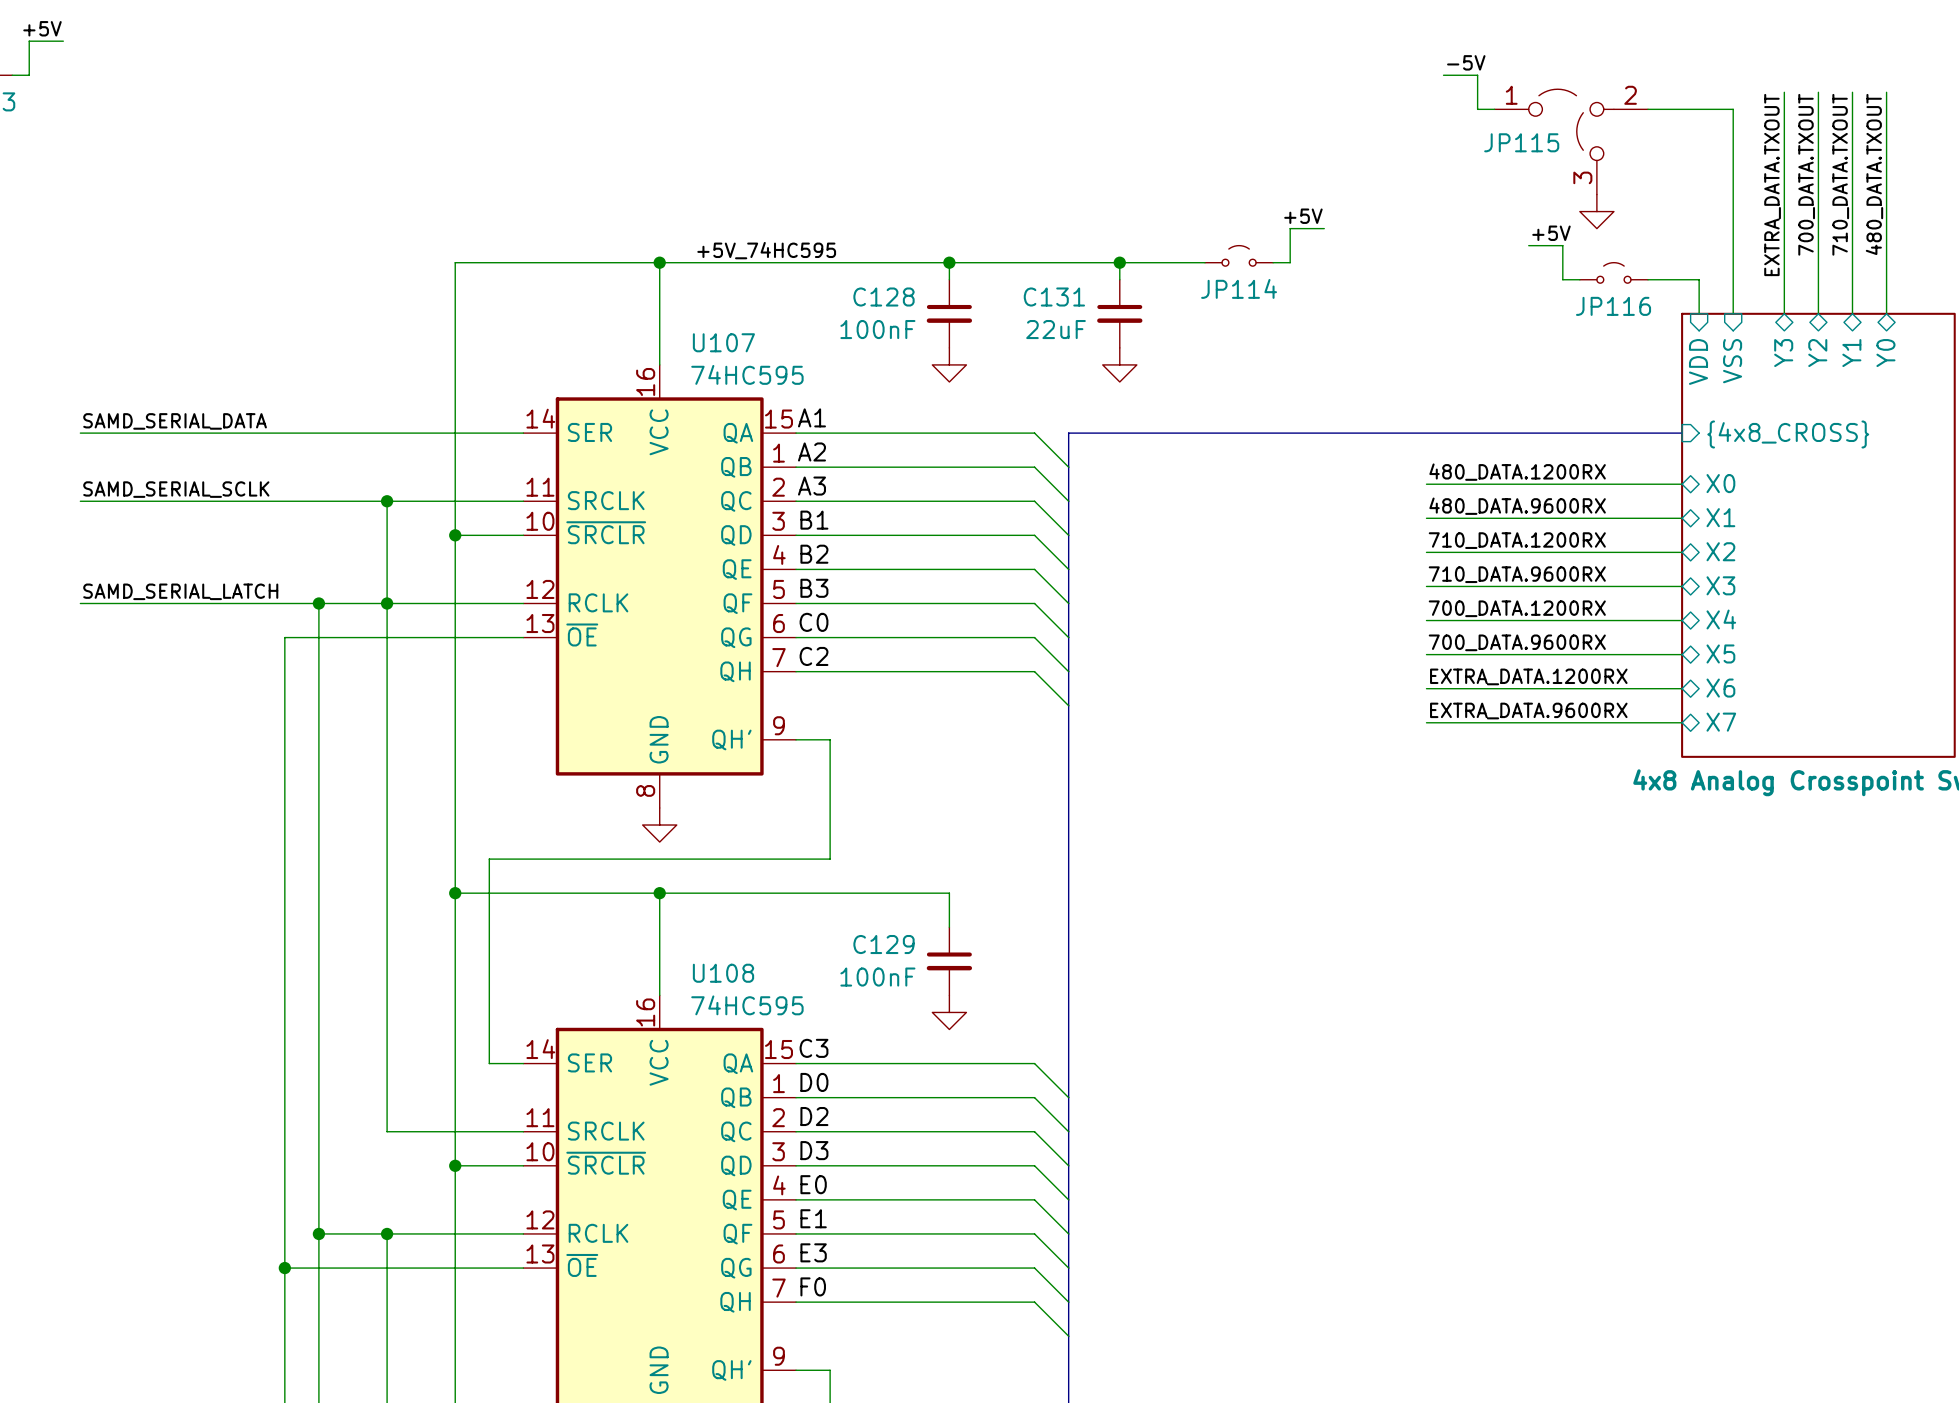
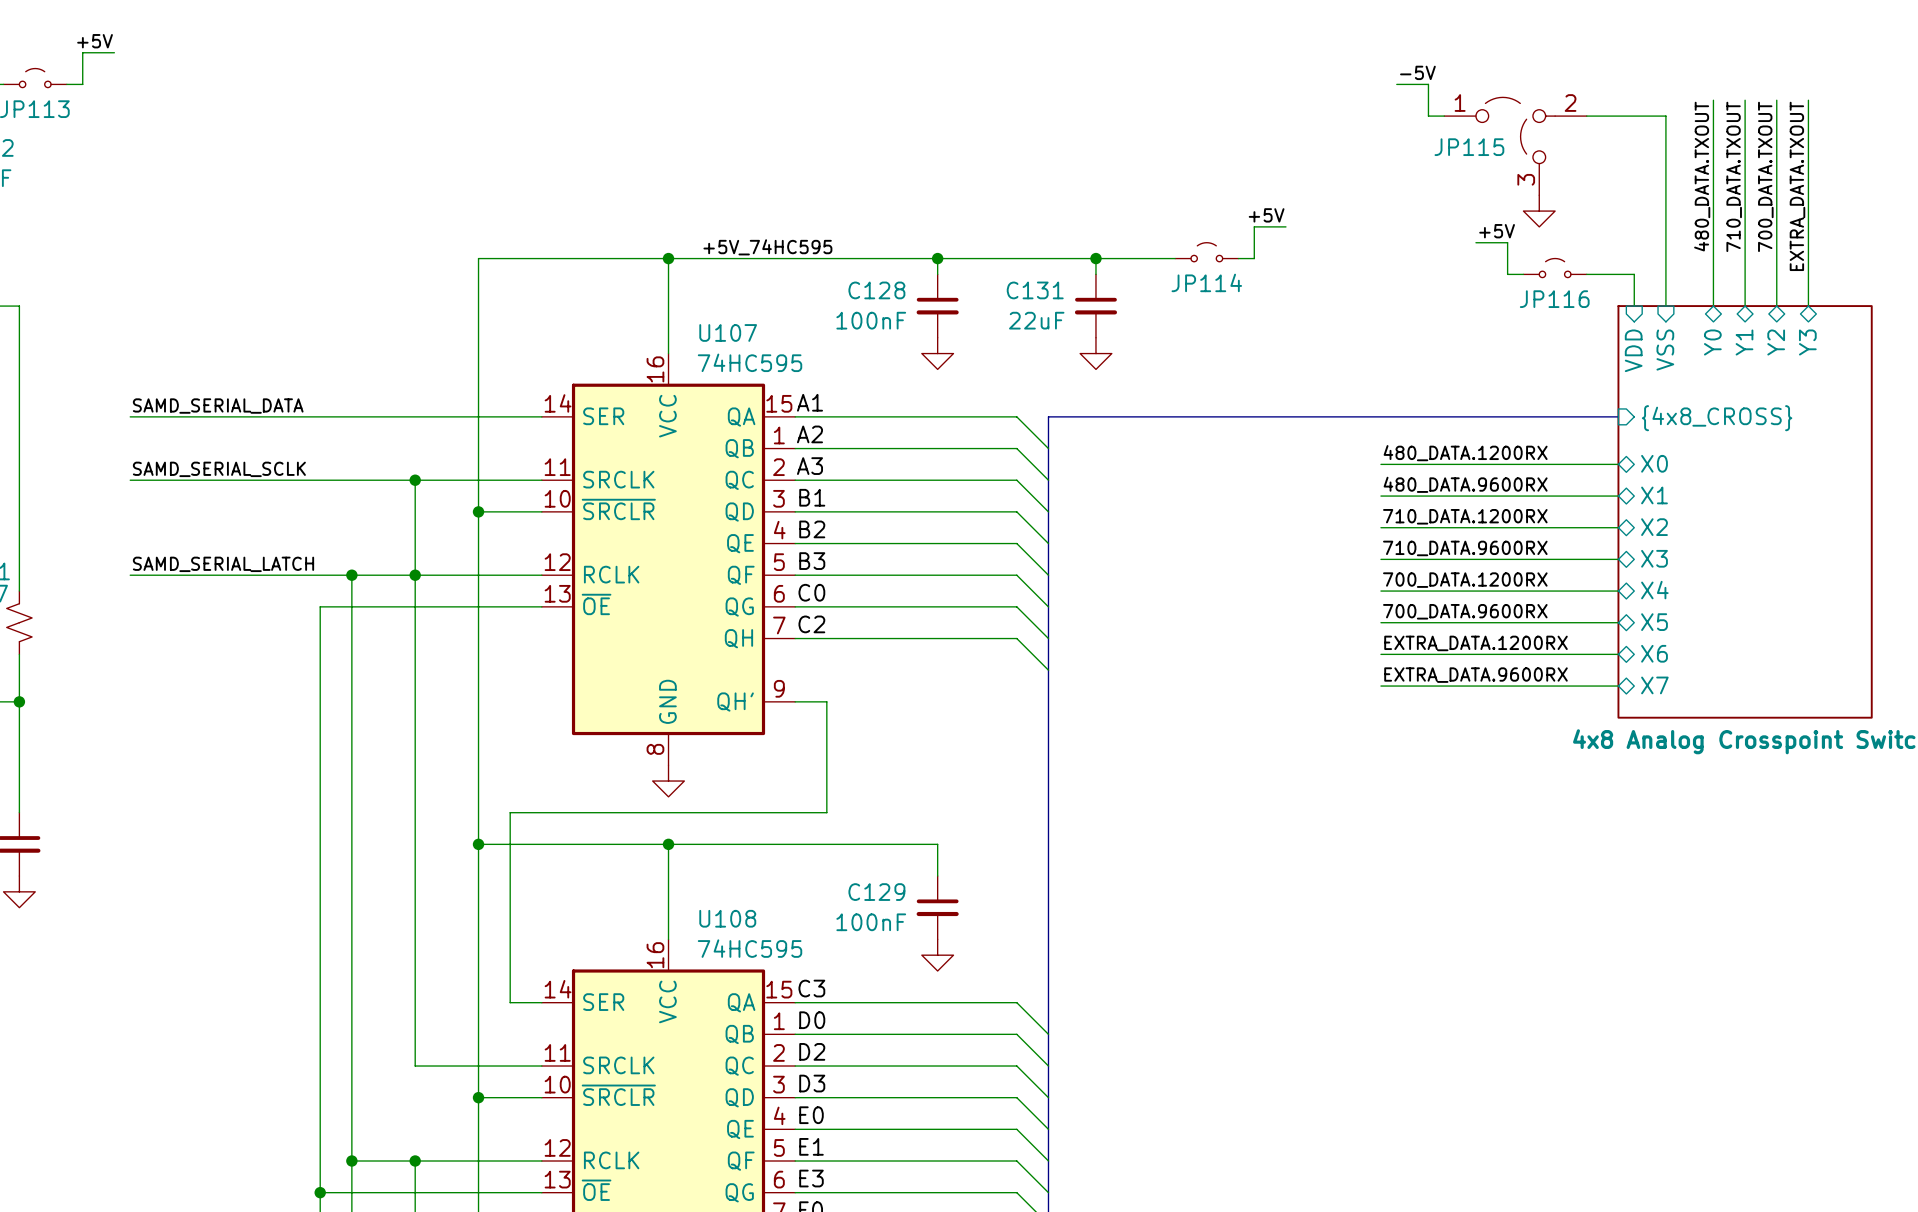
label: 700_DATA.TXOUT (1806, 174) -> 710_DATA.TXOUT (1734, 176)
label: 710_DATA.TXOUT (1840, 174) -> 700_DATA.TXOUT (1765, 176)
label: 480_DATA.TXOUT (1874, 174) -> EXTRA_DATA.TXOUT (1797, 186)
label: EXTRA_DATA.TXOUT (1772, 185) -> 480_DATA.TXOUT (1702, 176)
sheet pin: Y3 (1783, 353) -> Y0 (1712, 342)
sheet pin: Y2 (1817, 353) -> Y1 (1744, 342)
sheet pin: Y1 (1851, 353) -> Y2 (1776, 342)
sheet pin: Y0 (1885, 353) -> Y3 (1807, 342)

